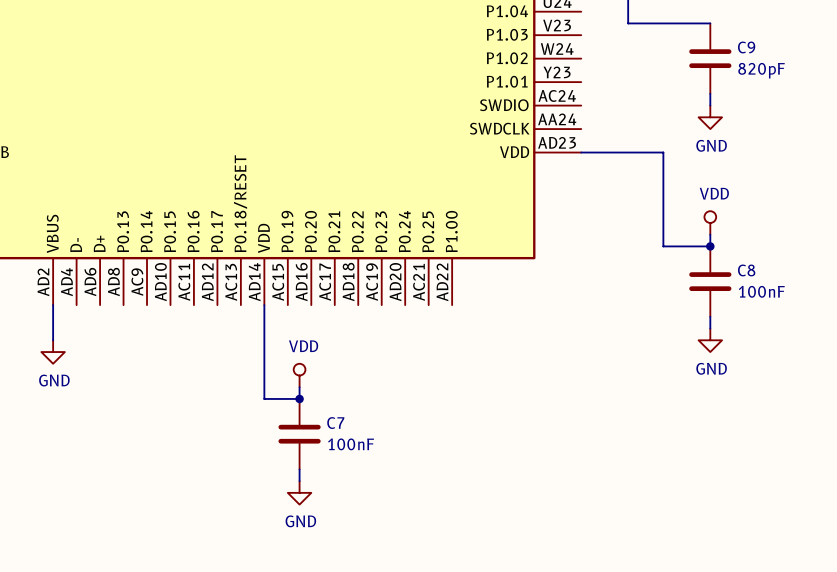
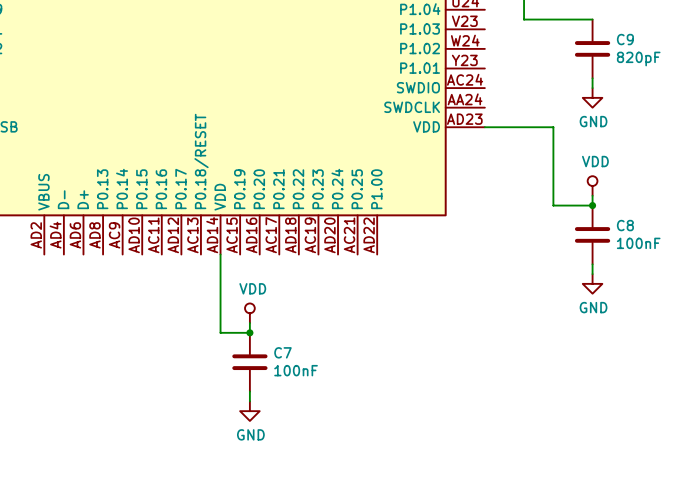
wire: (53, 305) (53, 340) -> none
power symbol: GND (53, 352) -> none

